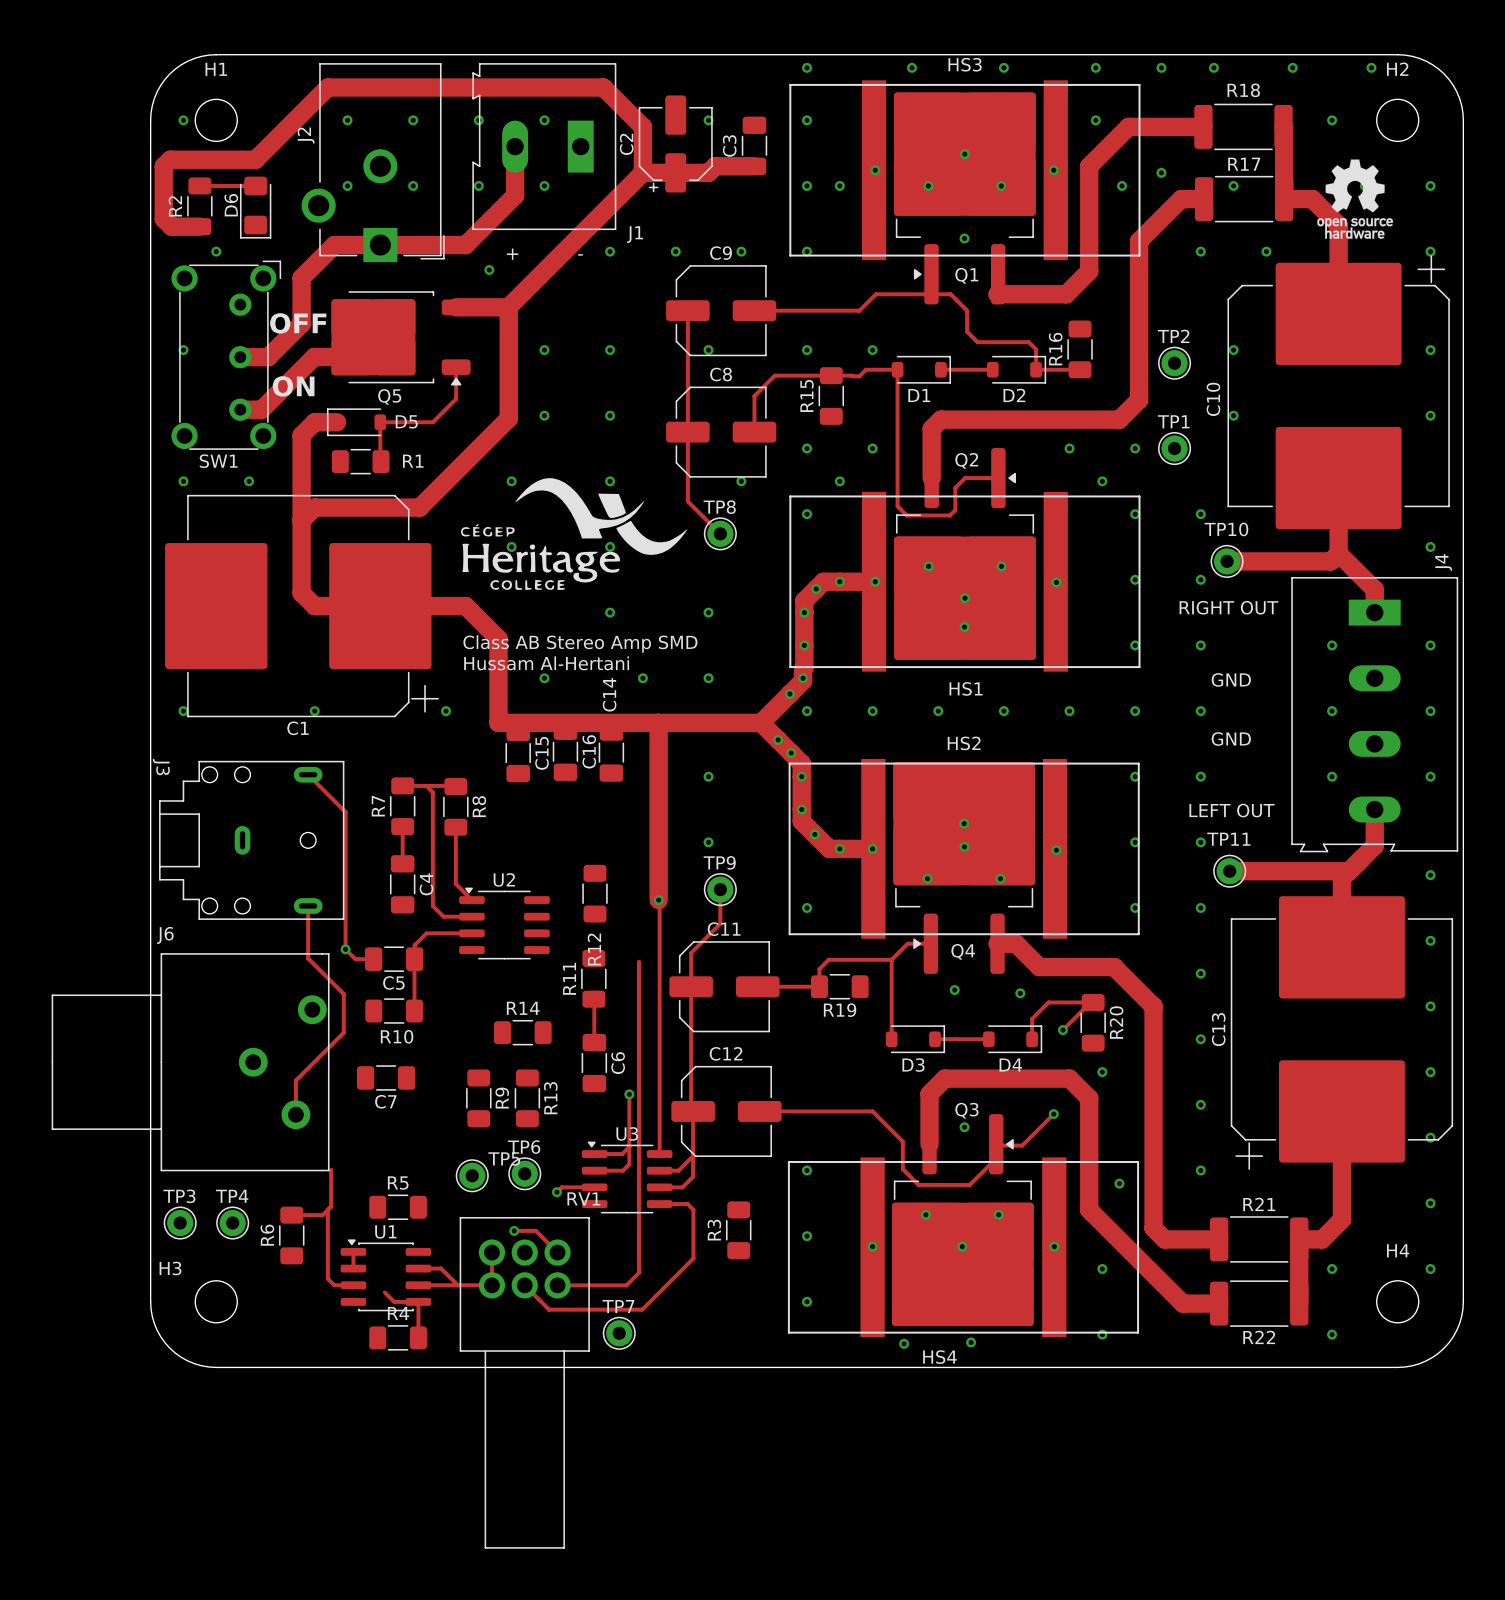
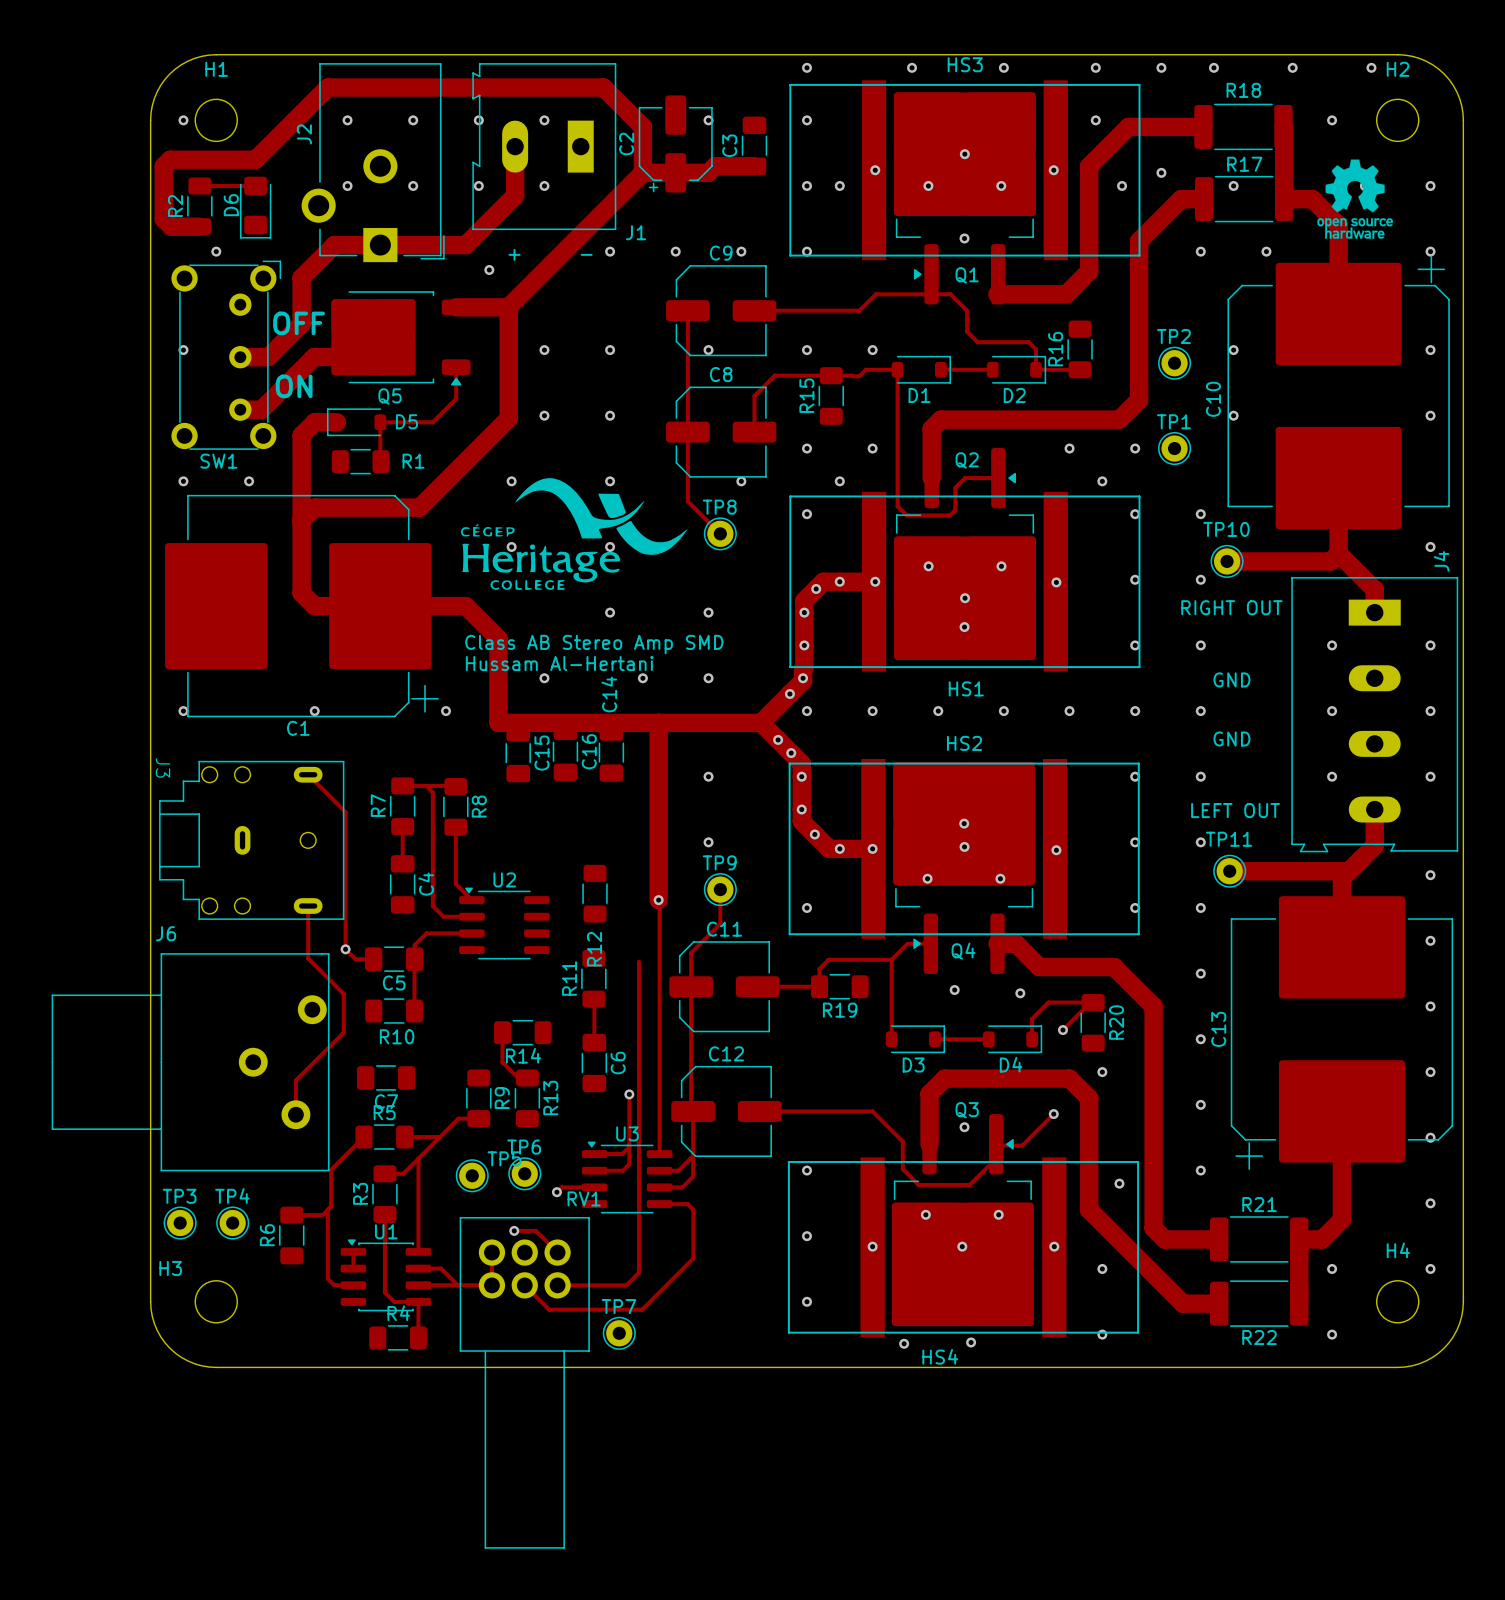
R14 name position: R14 (523, 1008) -> R14 (523, 1055)
track: none -> (502, 1032) (502, 1062) (518, 1077)
track: none -> (478, 1118) (458, 1118) (403, 1173) (384, 1173)
track: none -> (363, 1137) (331, 1169)
track: none -> (404, 1137) (440, 1137)
track: none -> (418, 1158) (418, 1251)
R5 position: (398, 1207) -> (384, 1137)
track: none -> (384, 1214) (384, 1292)
R3 position: (738, 1230) -> (384, 1194)

